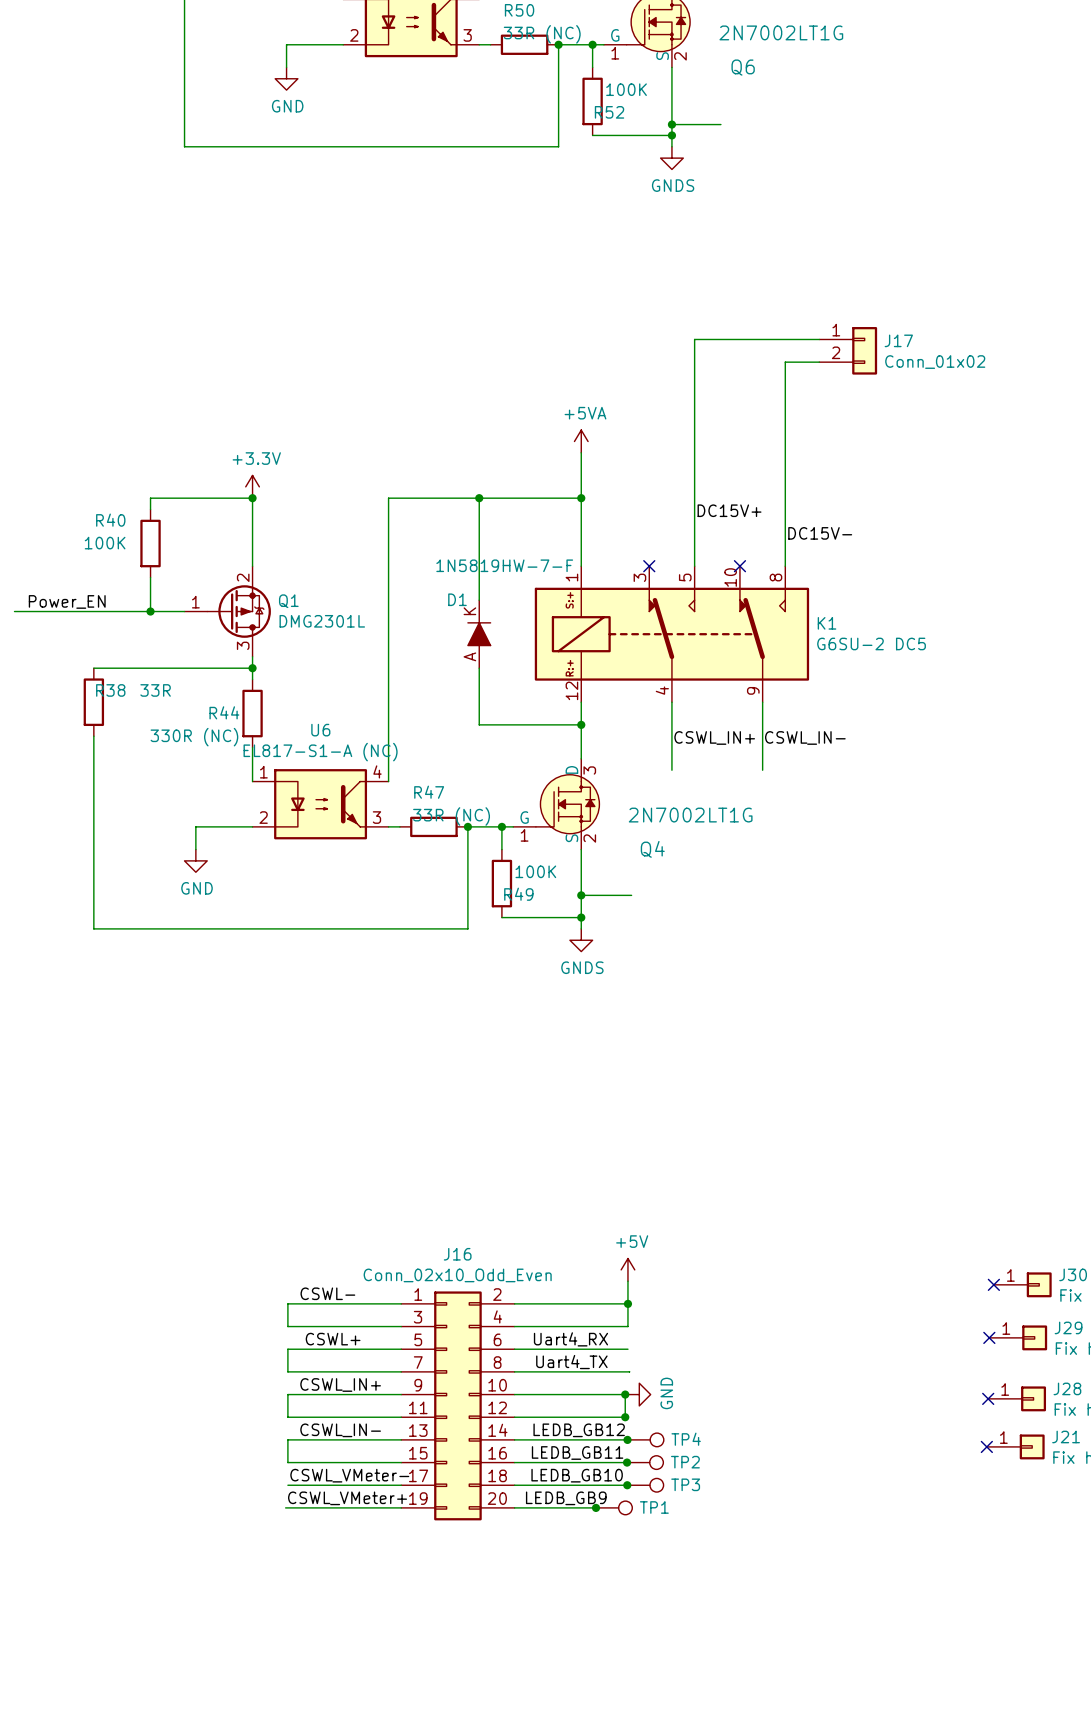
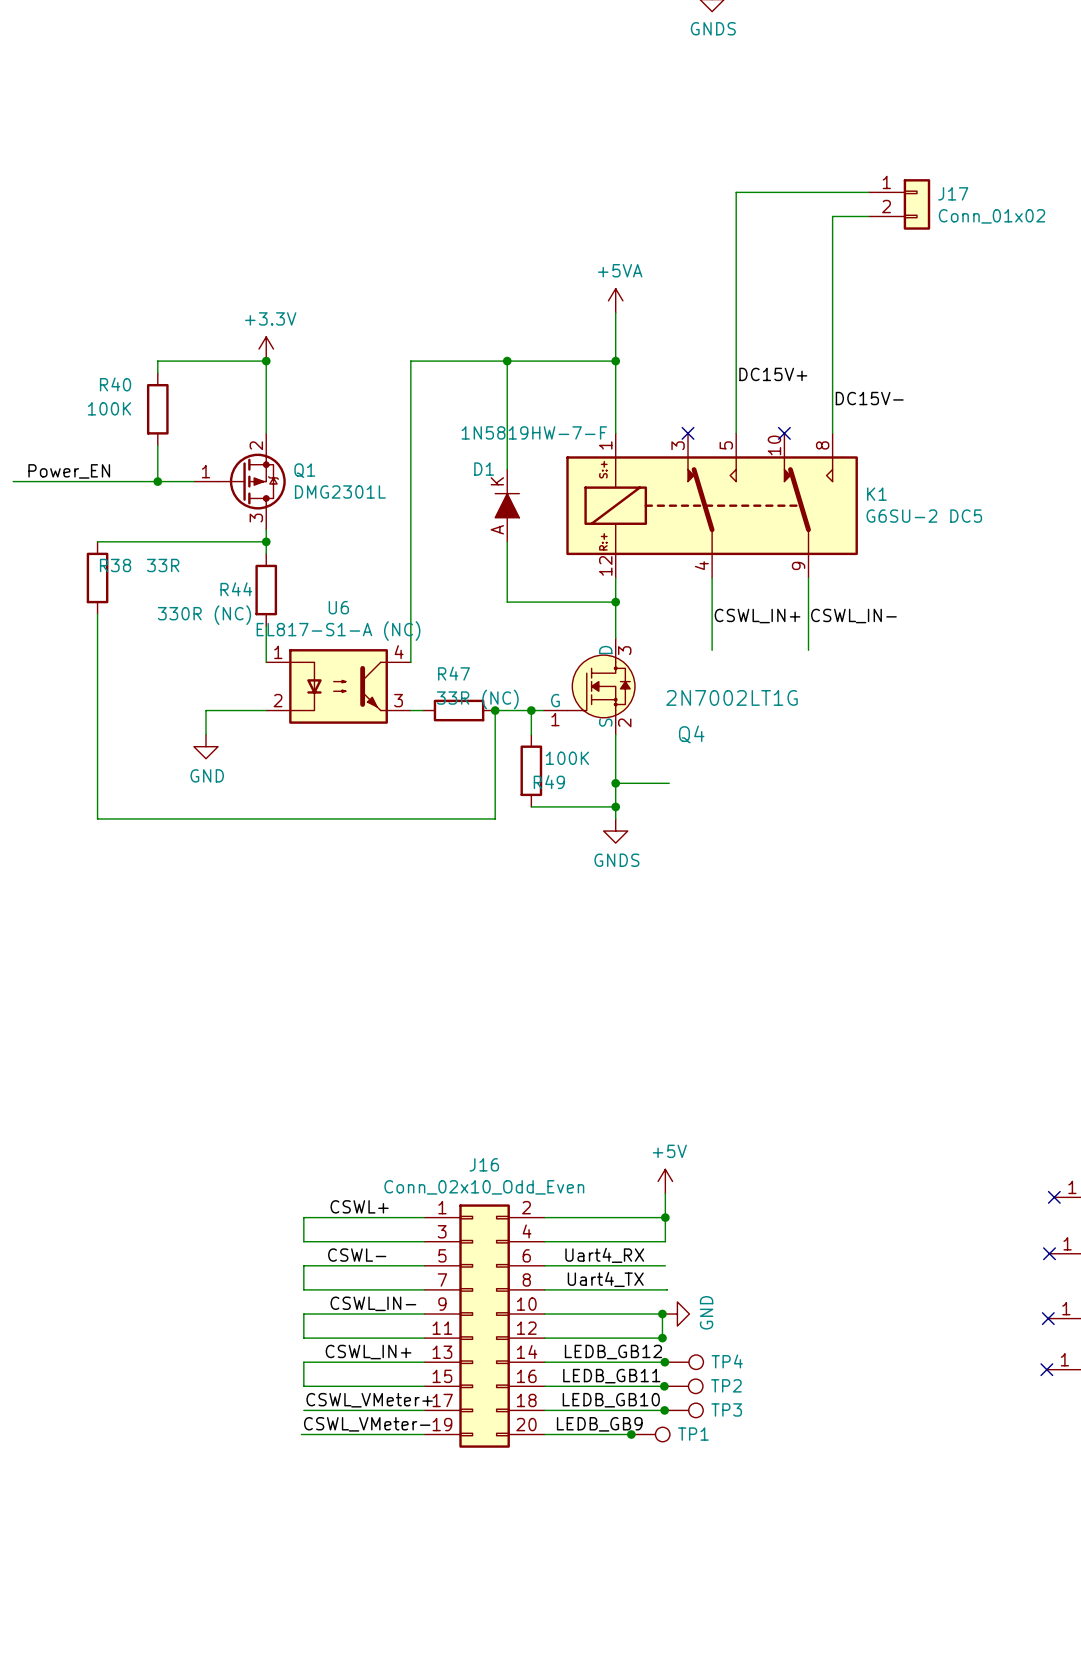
label: CSWL- (327, 1293) -> CSWL+ (359, 1206)
label: CSWL+ (333, 1339) -> CSWL- (357, 1255)
label: CSWL_IN+ (340, 1384) -> CSWL_IN- (373, 1303)
label: CSWL_IN- (340, 1430) -> CSWL_IN+ (368, 1352)
label: CSWL_VMeter- (349, 1475) -> CSWL_VMeter+ (369, 1400)
label: CSWL_VMeter+ (347, 1498) -> CSWL_VMeter- (367, 1424)

